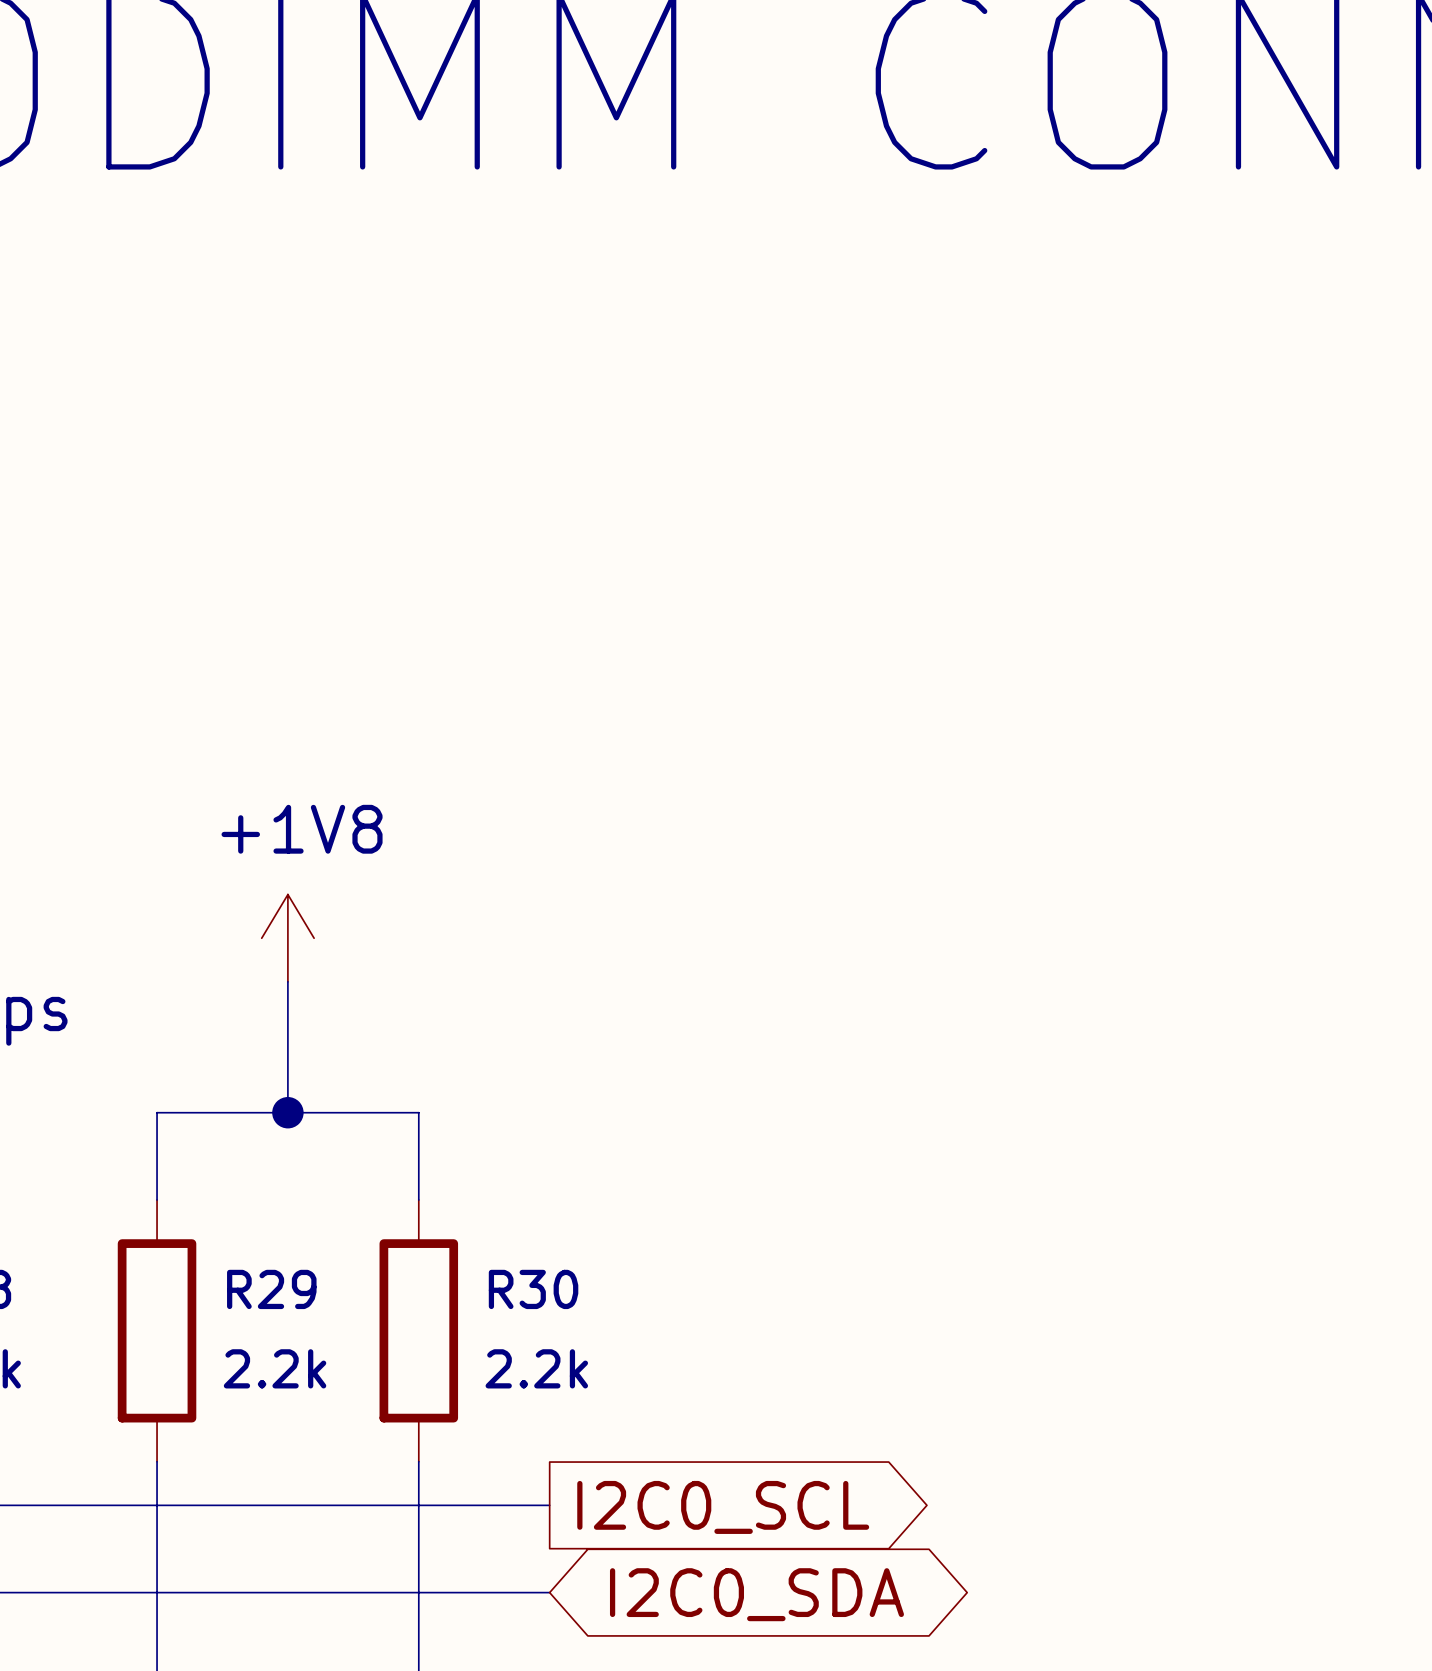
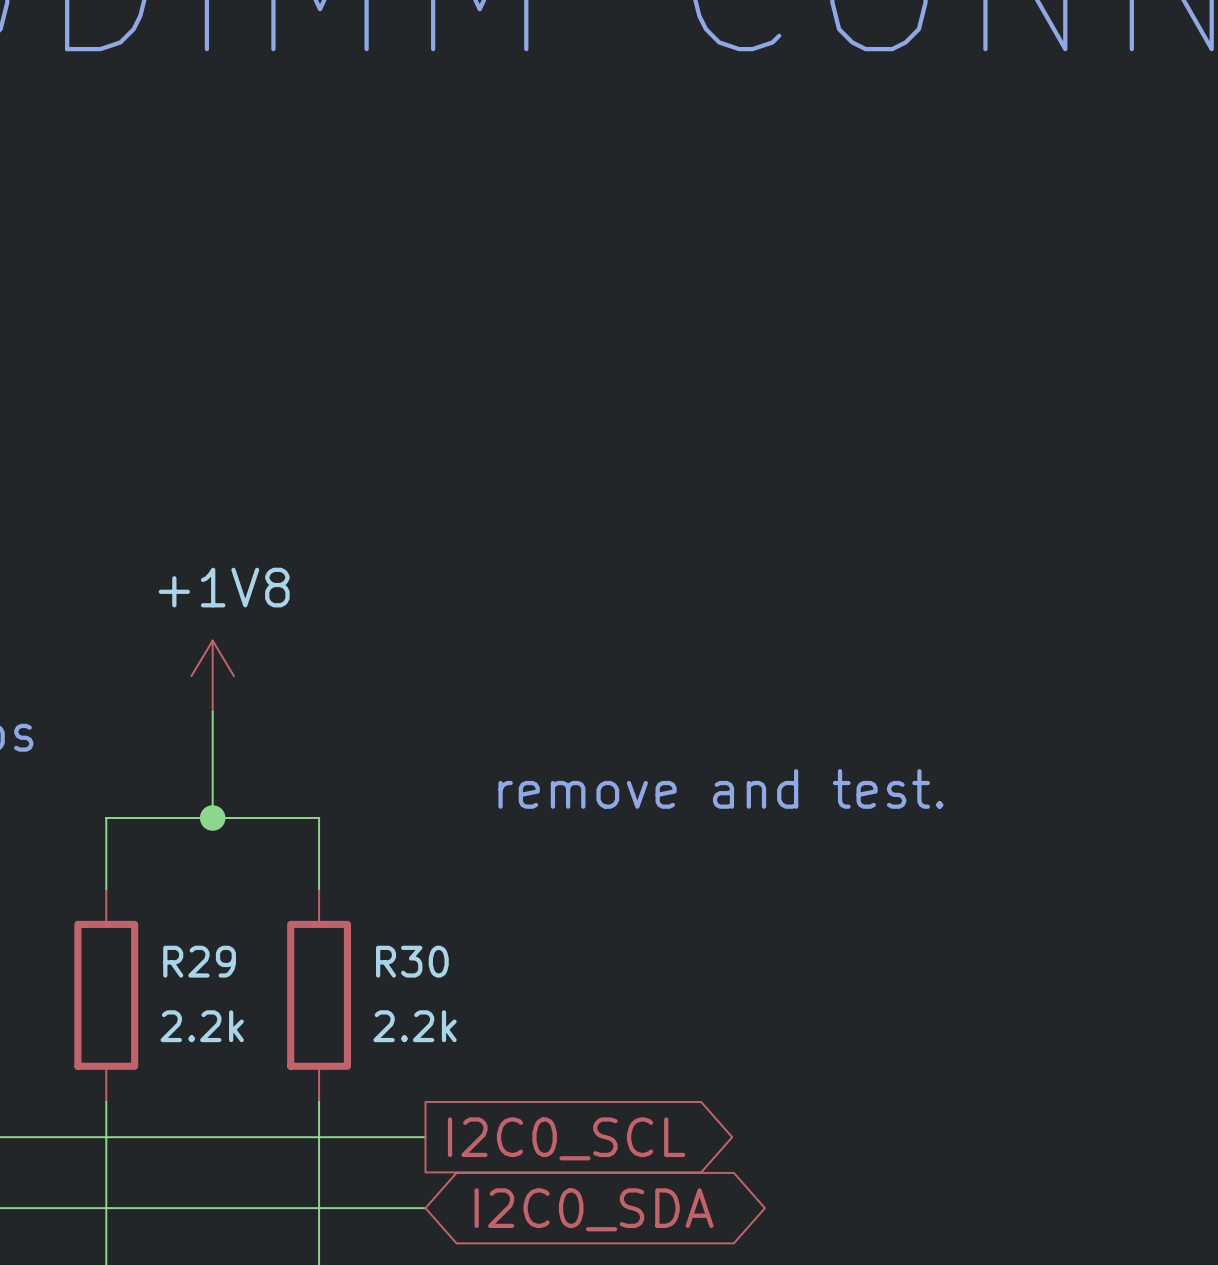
text: none -> remove and test. (720, 788)

